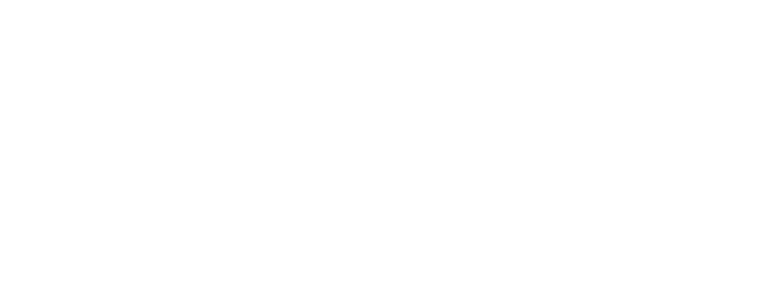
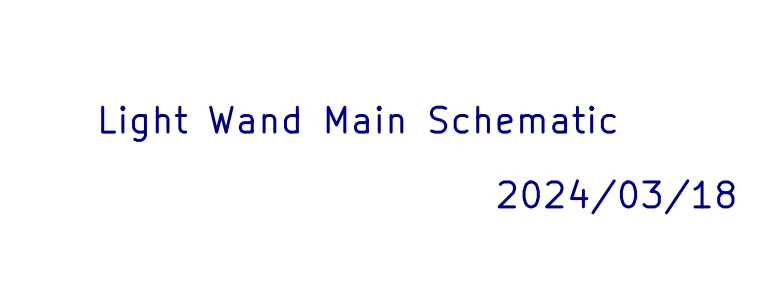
text: none -> Light Wand Main Schematic (358, 123)
text: none -> 2024/03/18 (616, 196)

